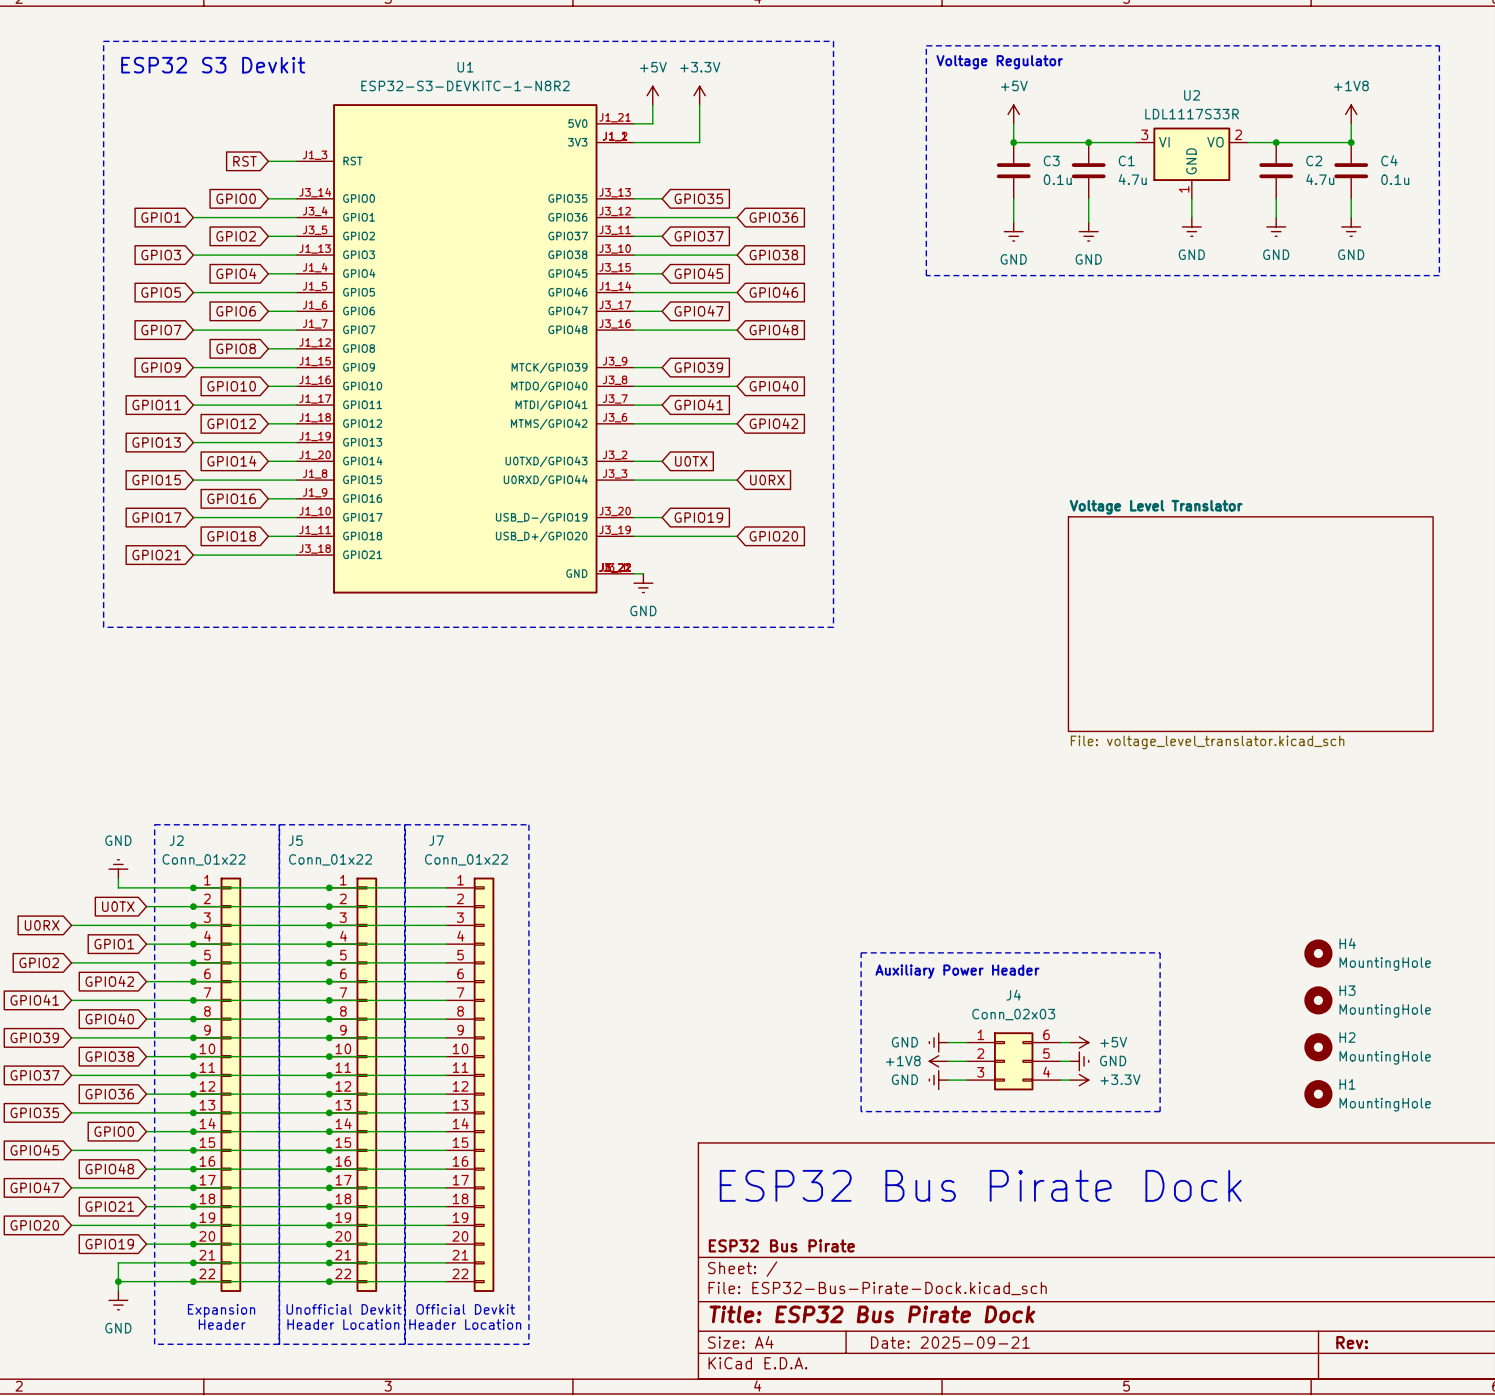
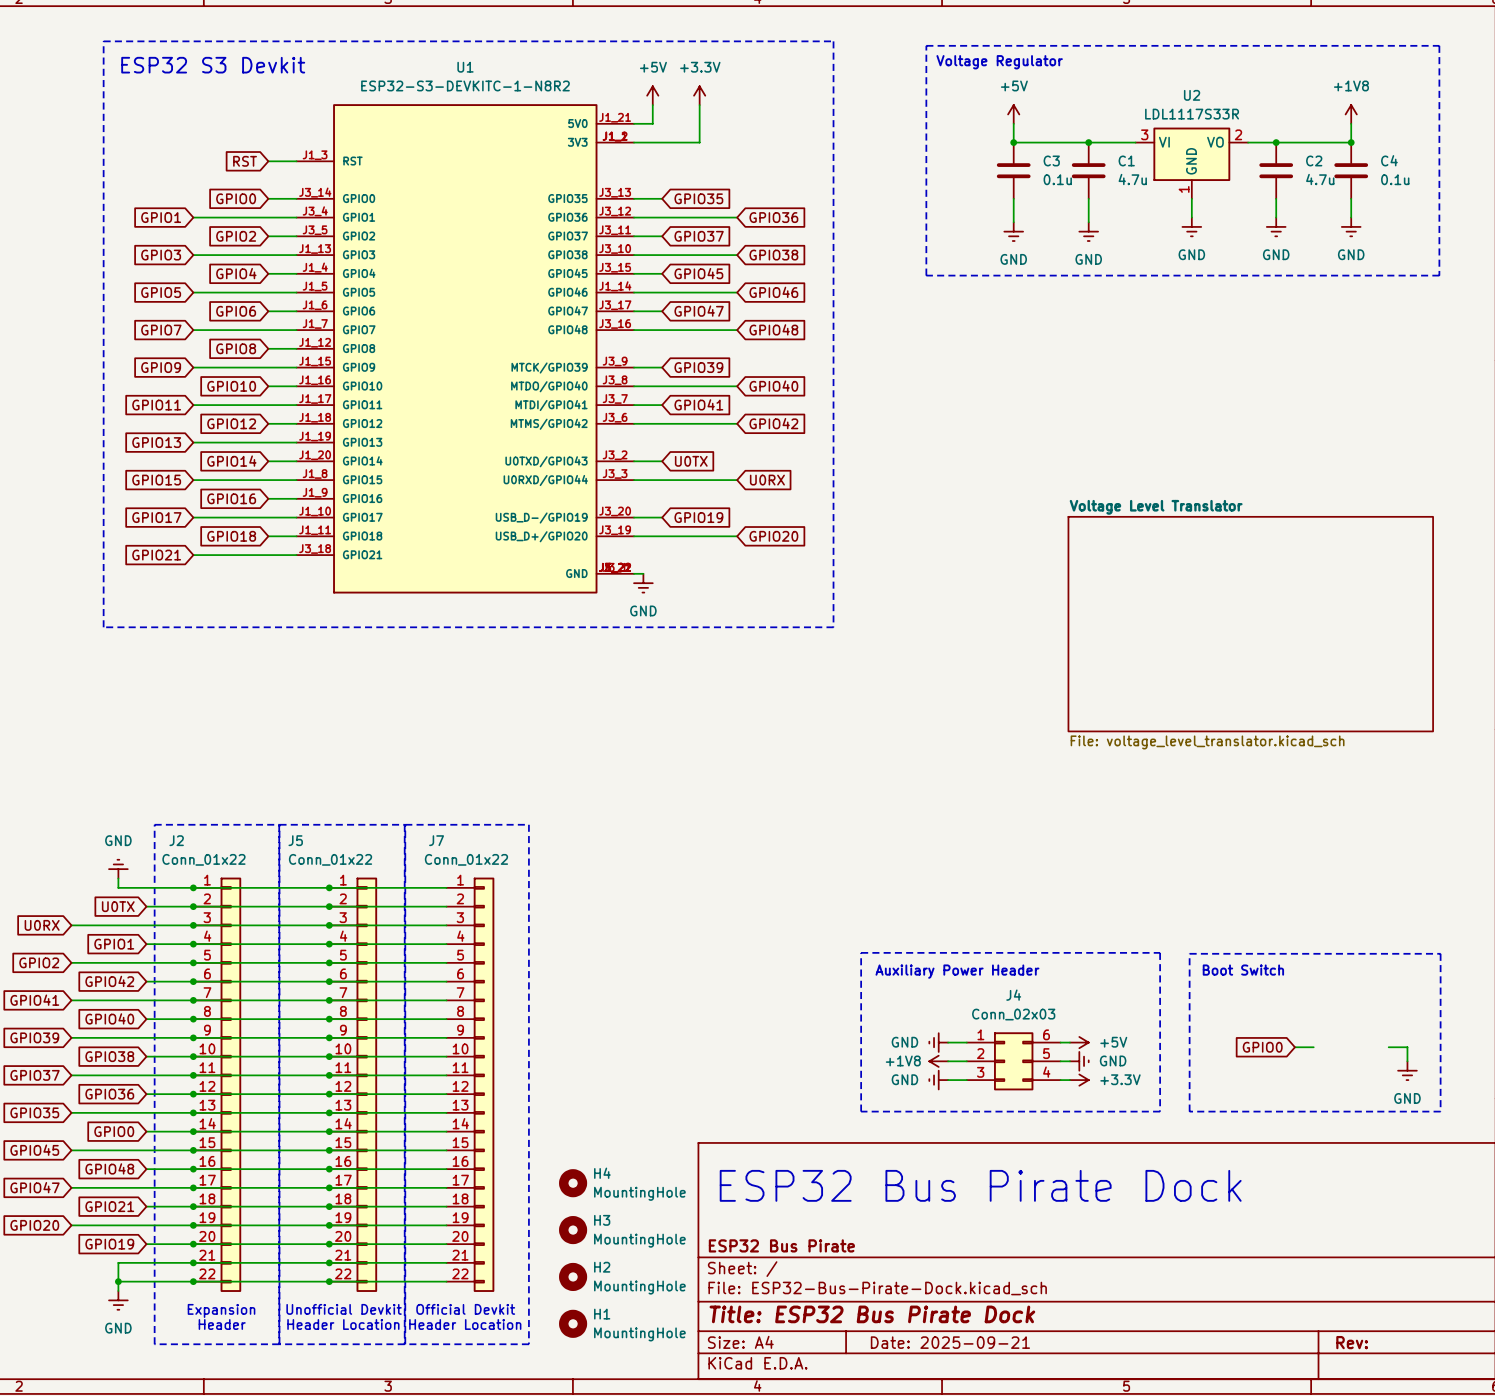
line: none -> (1189, 953) (1440, 953) (1440, 1111) (1189, 1111) (1189, 953)
H4 position: (1318, 953) -> (573, 1183)
text: none -> Boot Switch (1243, 970)
H3 position: (1318, 1000) -> (573, 1230)
global label: none -> GPIO0 (1262, 1047)
wire: none -> (1294, 1047) (1313, 1047)
H2 position: (1318, 1047) -> (573, 1276)
wire: none -> (1388, 1047) (1407, 1047) (1407, 1061)
power symbol: none -> GND (1407, 1070)
H1 position: (1318, 1094) -> (573, 1323)

